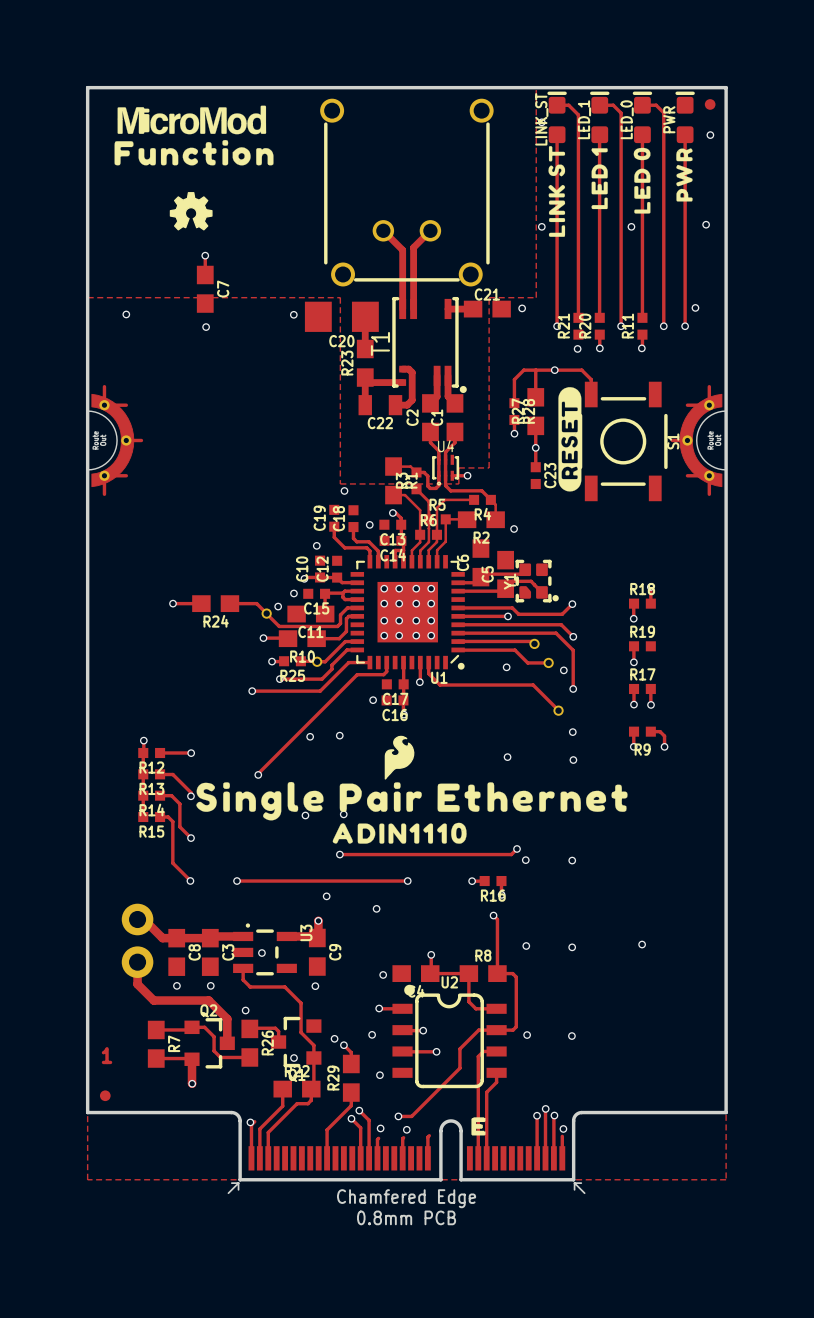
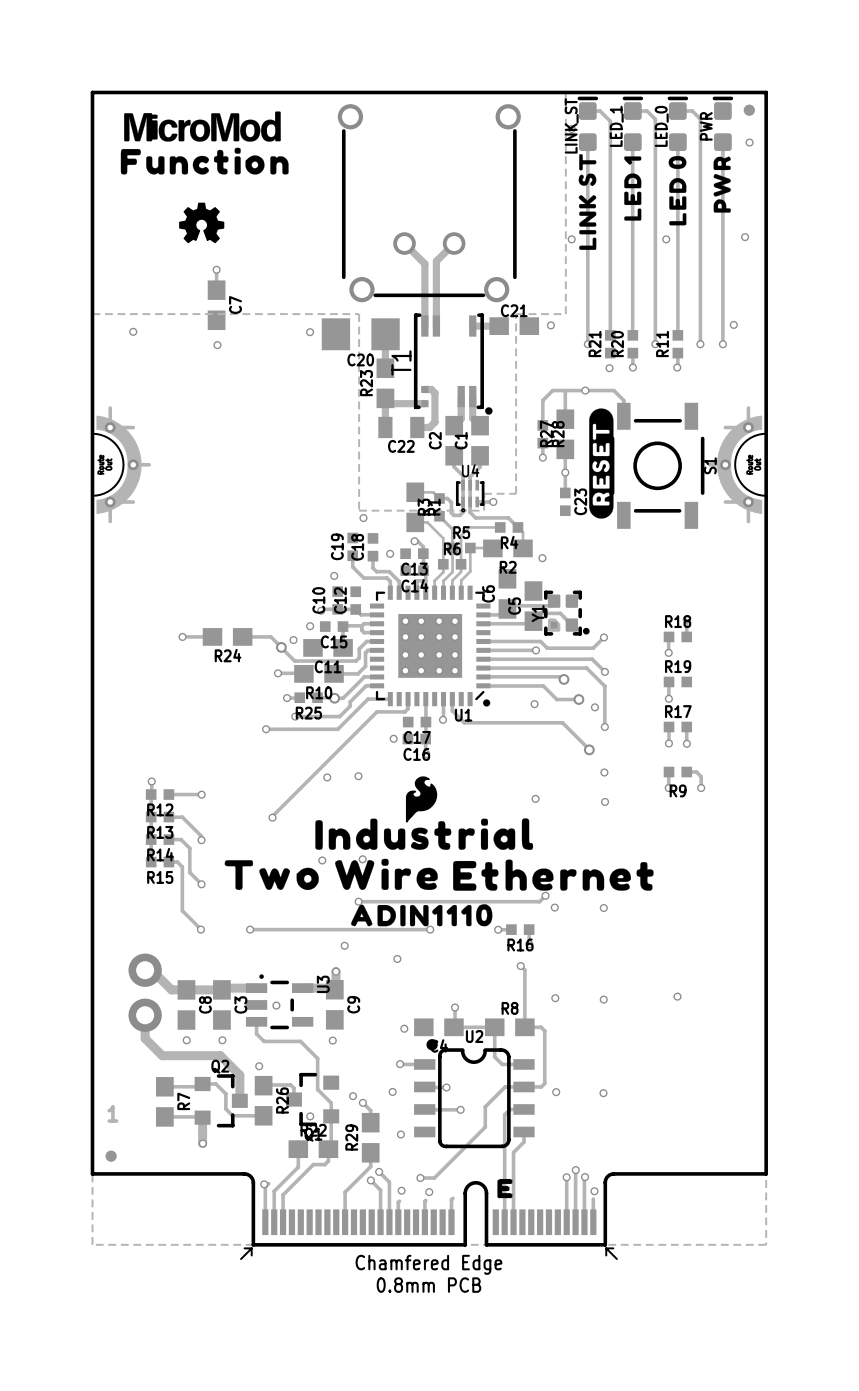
drawing shape: [196, 781, 628, 821] -> [315, 818, 534, 850]
drawing: none -> [224, 858, 654, 891]
drawing position: (399, 833) -> (421, 915)

